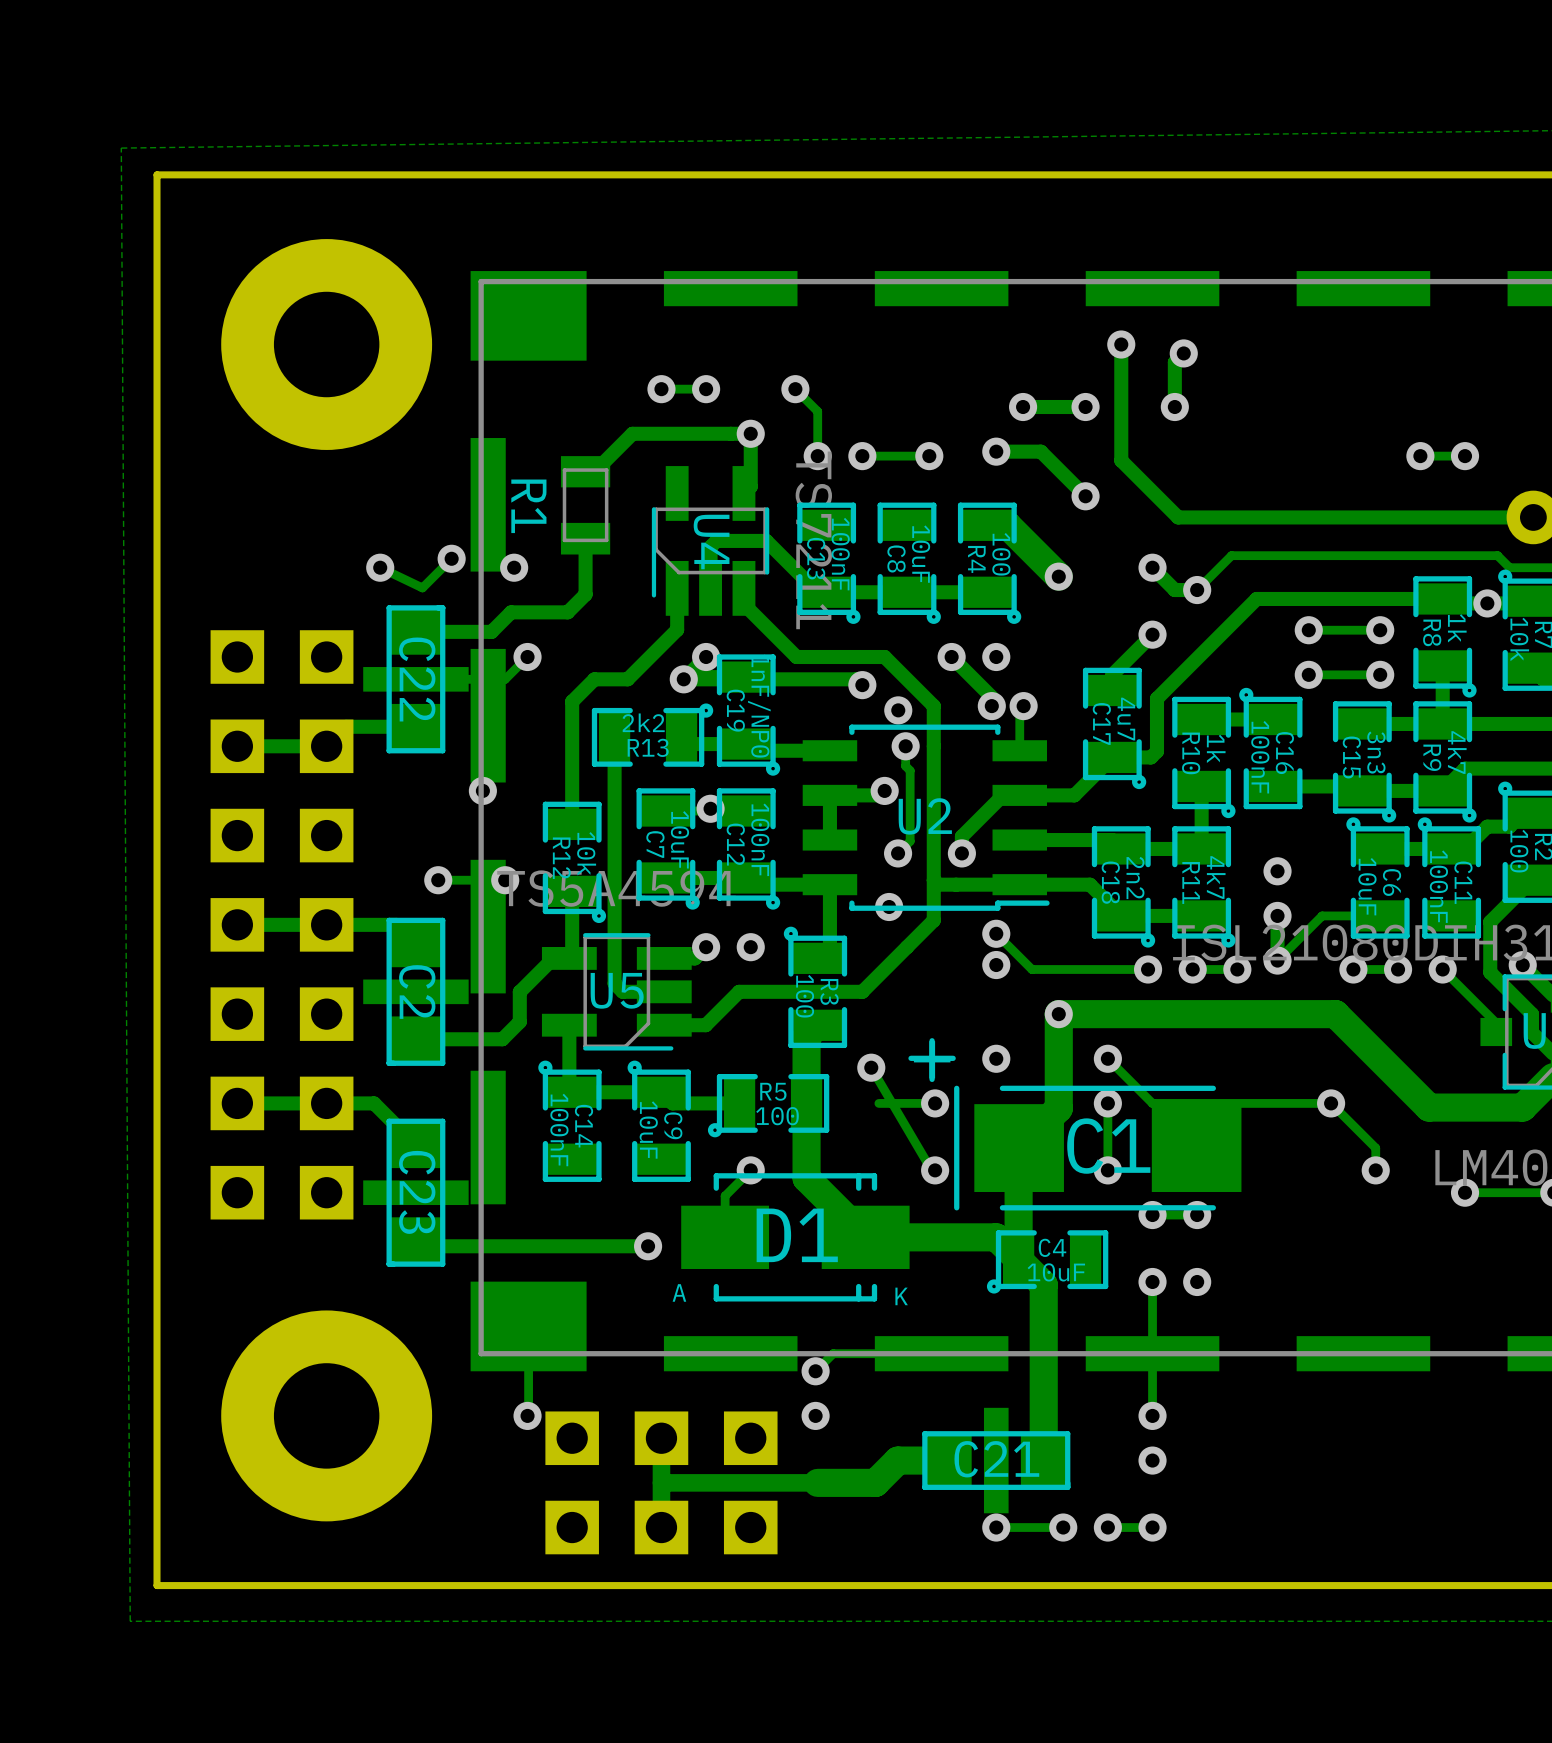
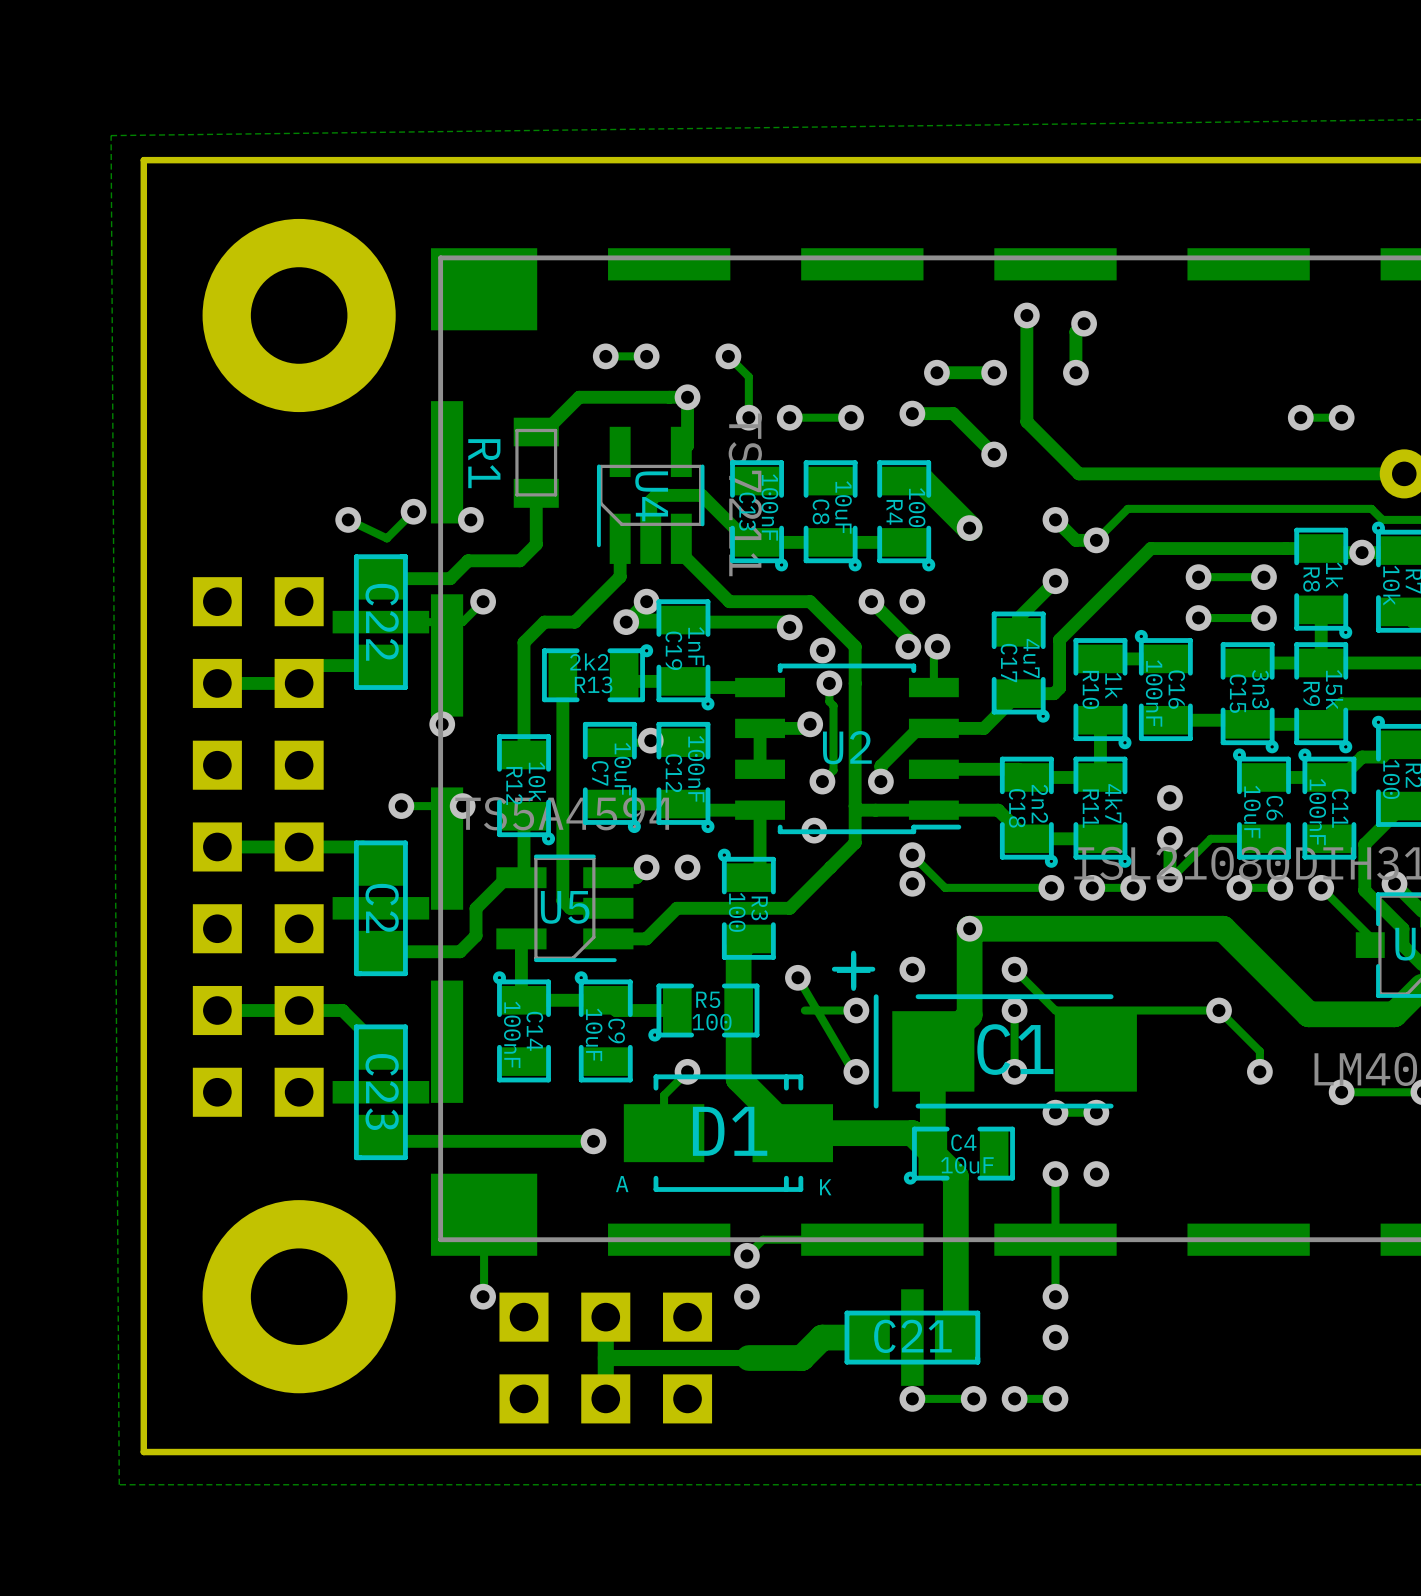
C19 value: 1nF/NP0 (759, 706) -> 1nF (696, 646)
R9 value: 4k7 (1457, 752) -> 15k (1334, 689)

